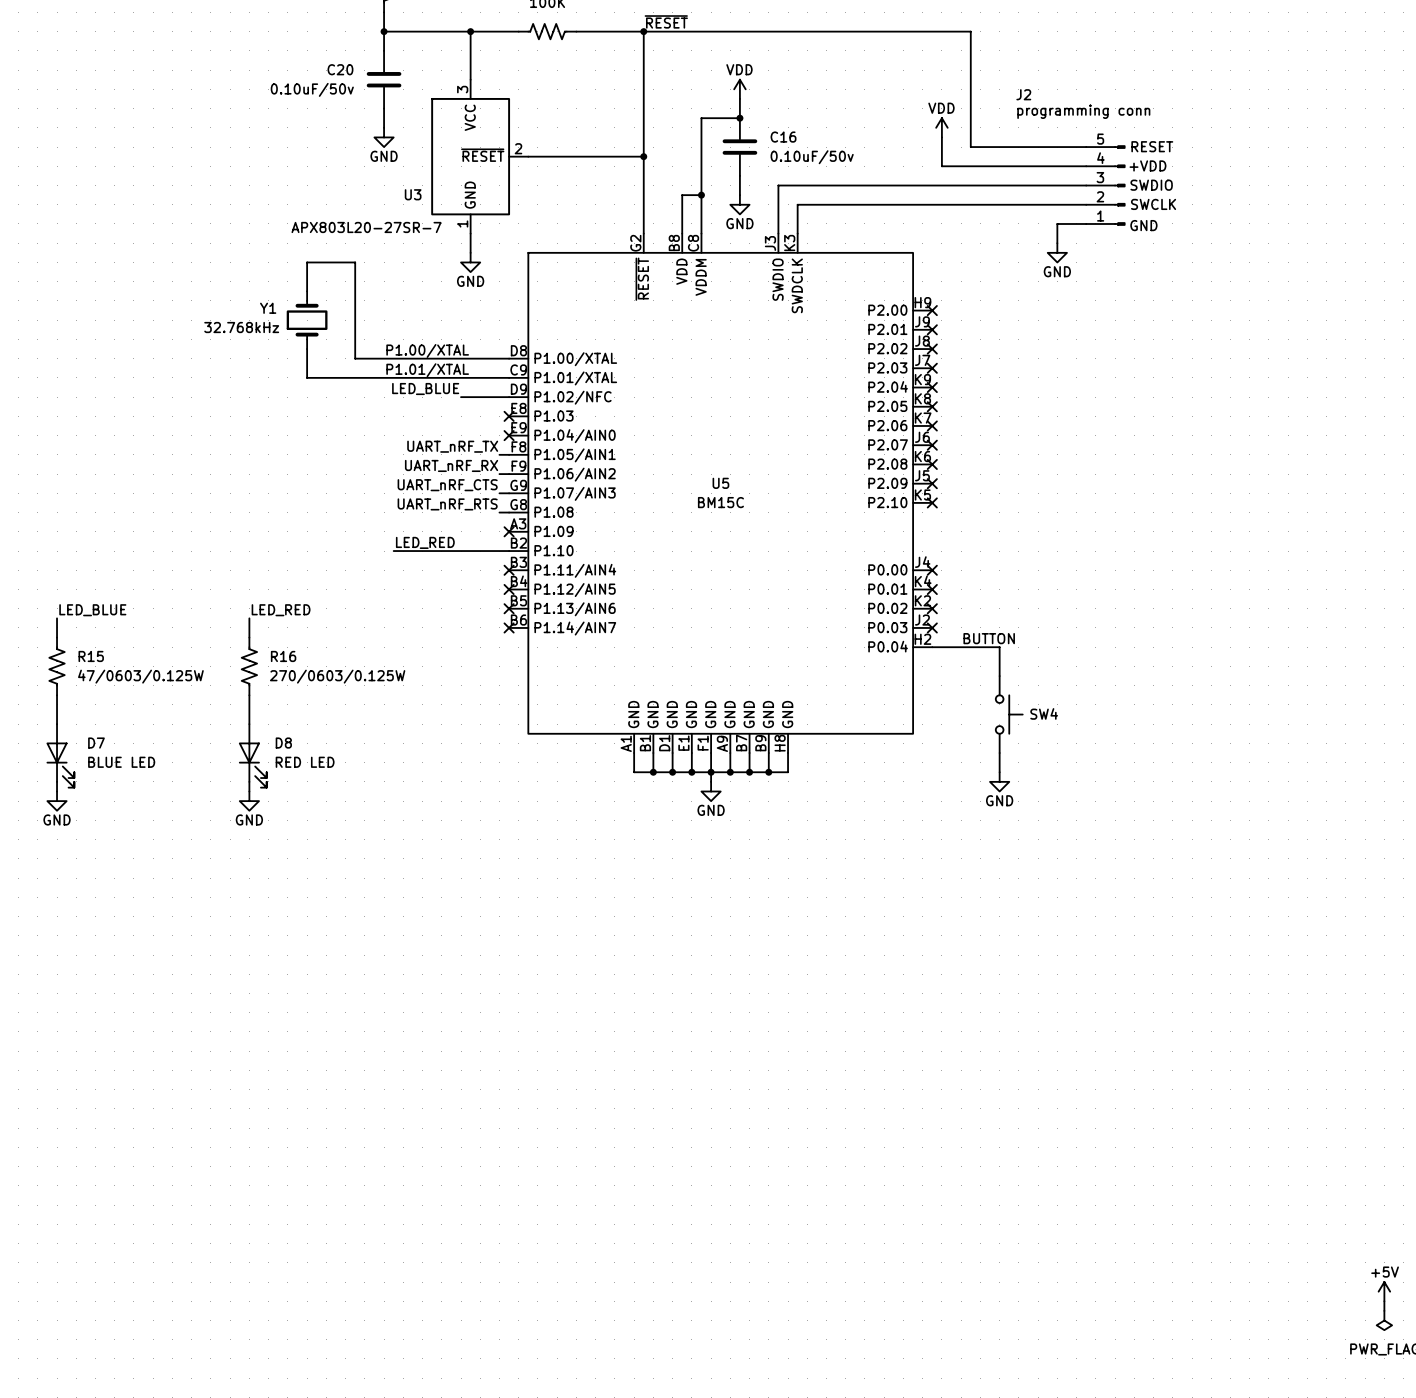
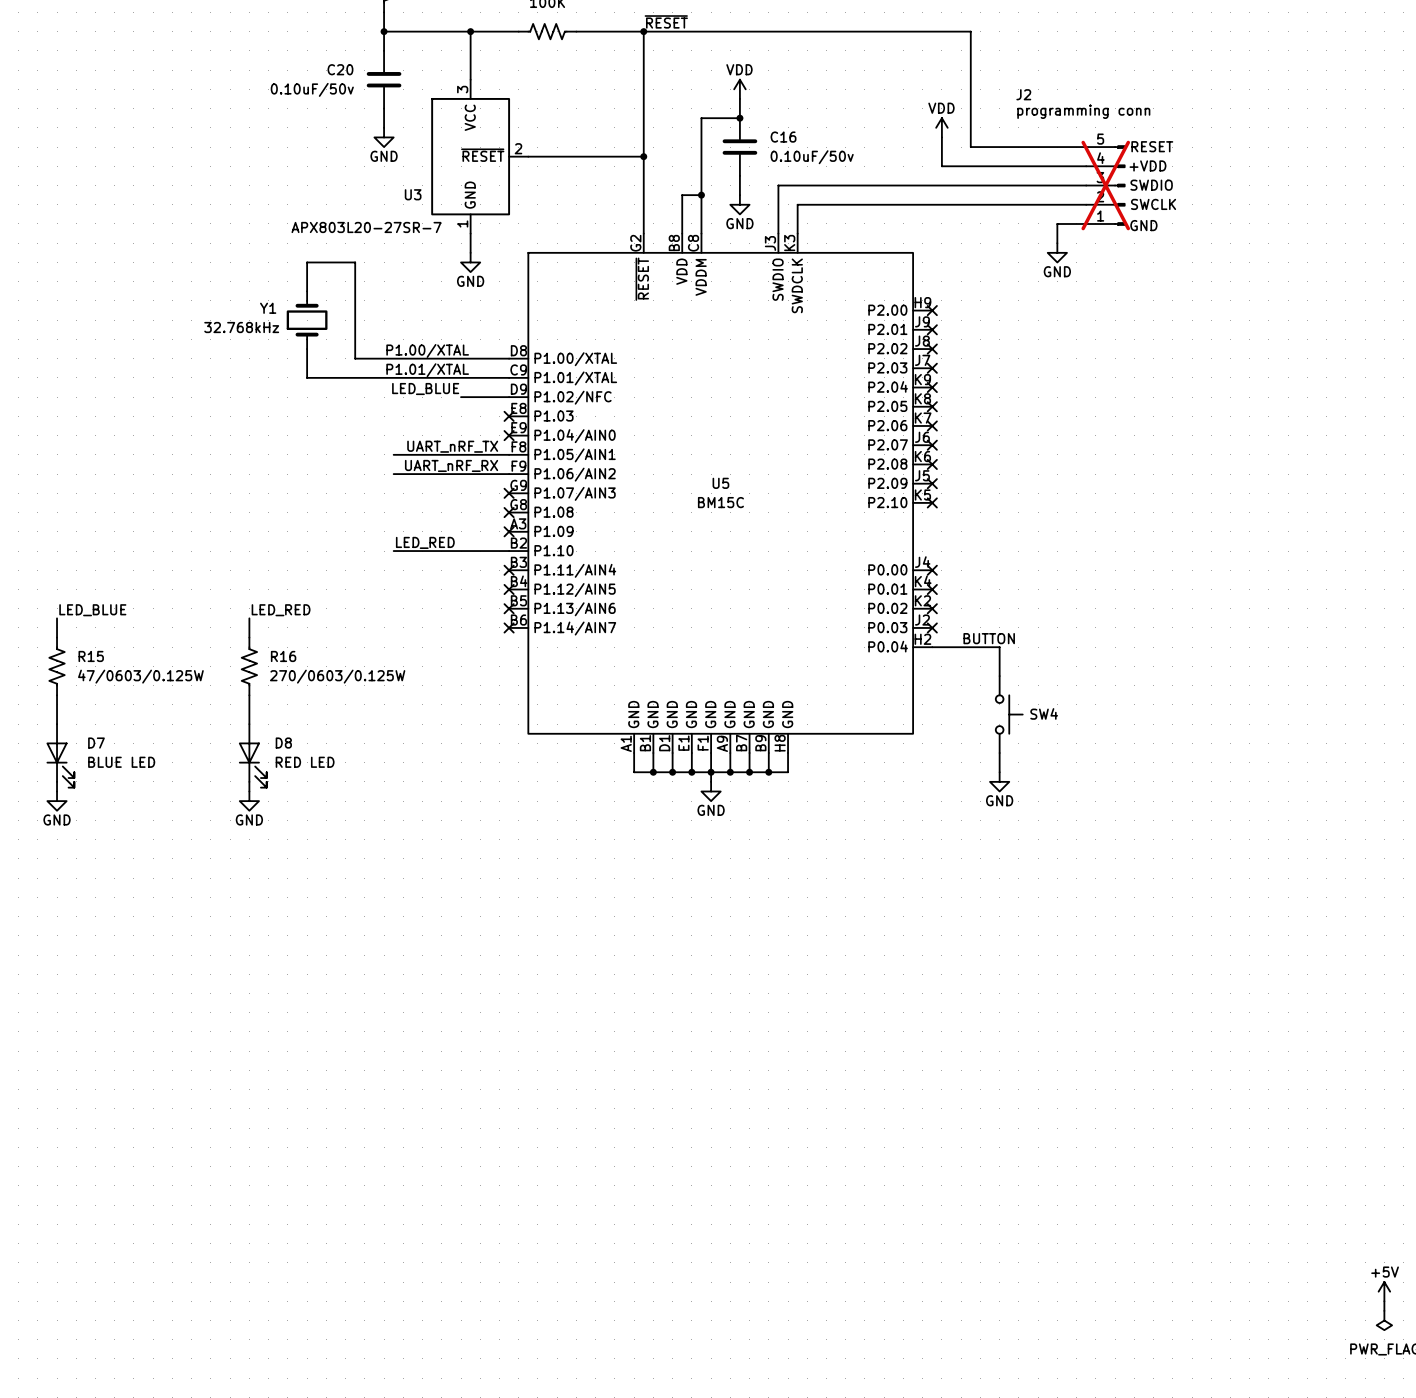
J2 do-not-place cross: none -> (1105, 185)
wire: none -> (393, 454) (499, 454)
wire: none -> (393, 474) (499, 474)
label: UART_nRF_CTS (447, 485) -> none
wire: (499, 493) (509, 493) -> none
no-connect mark: none -> (509, 493)
label: UART_nRF_RTS (447, 504) -> none
wire: (499, 512) (509, 512) -> none
no-connect mark: none -> (509, 512)

